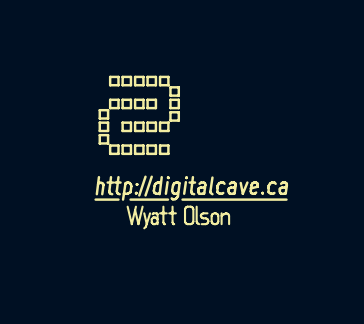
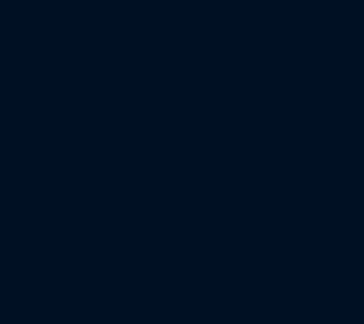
drawing: [98, 75, 181, 156] -> none
drawing: [94, 175, 289, 230] -> none

